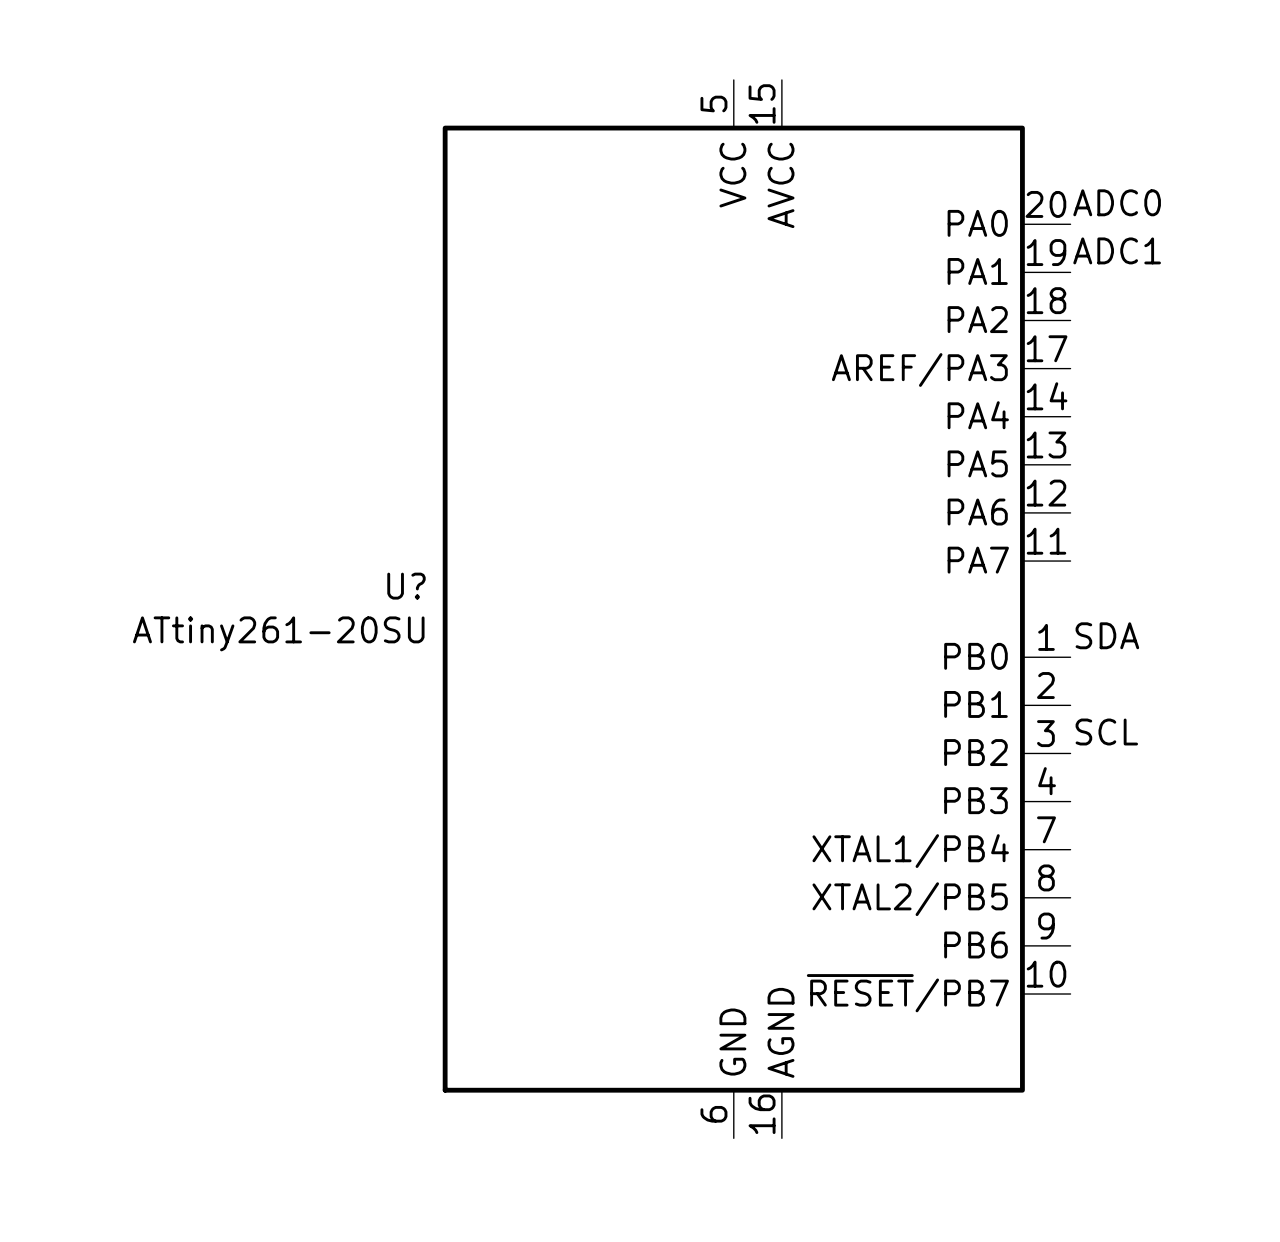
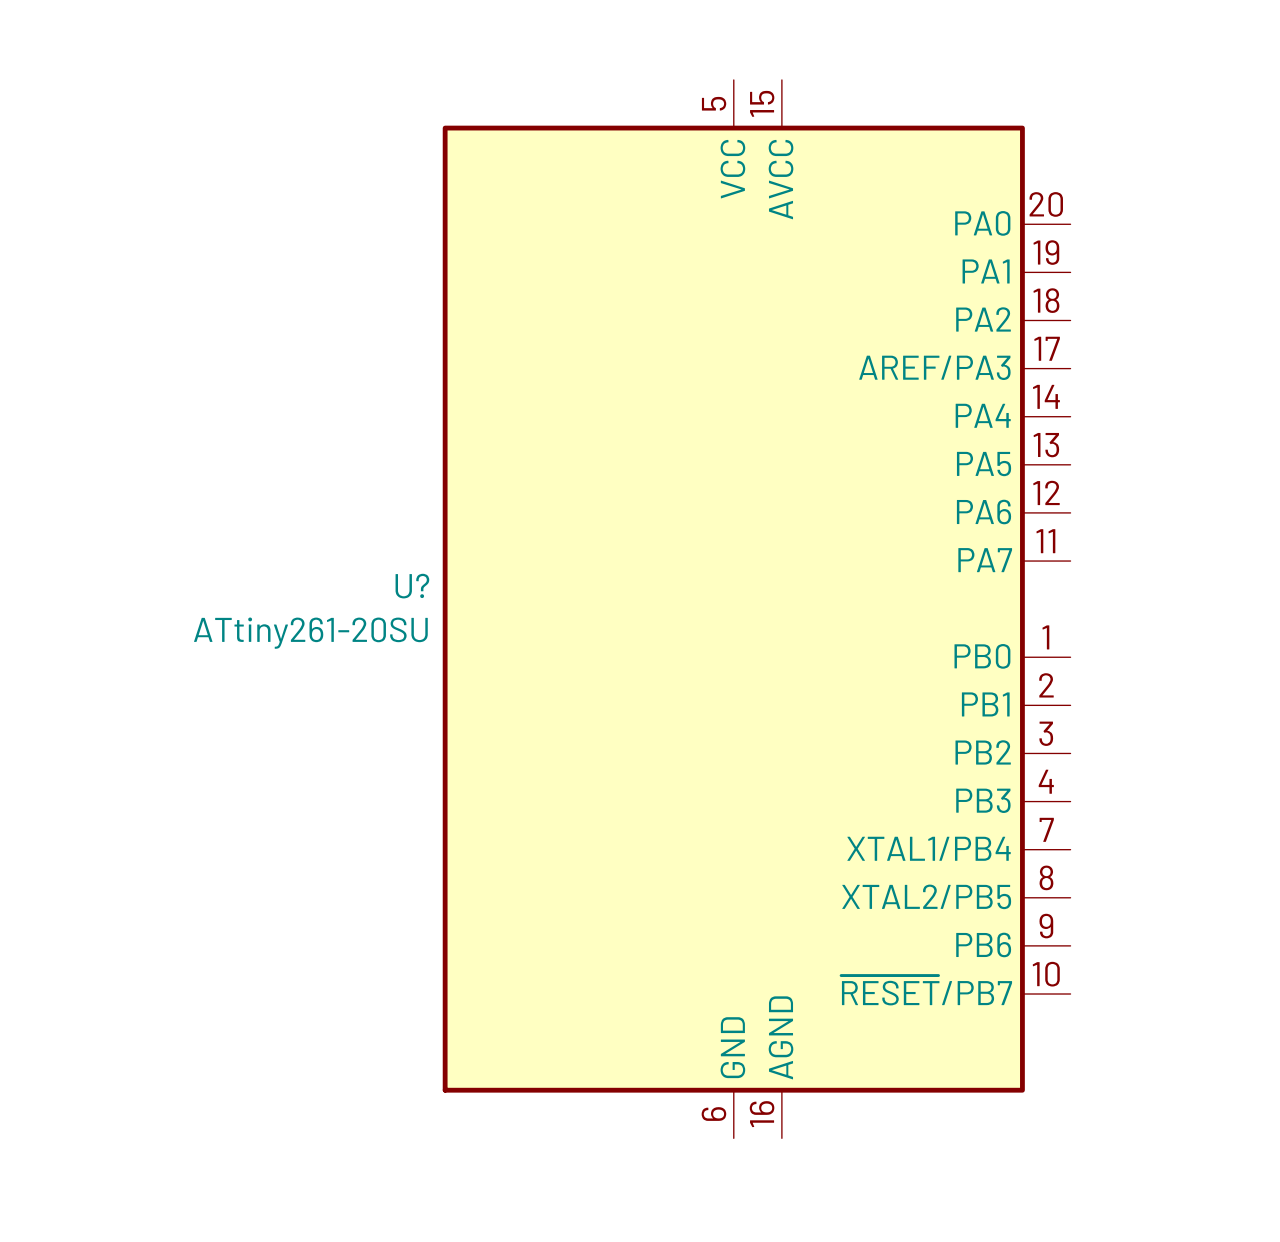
label: ADC0 (1117, 202) -> none
label: ADC1 (1117, 250) -> none
label: SDA (1107, 635) -> none
label: SCL (1106, 732) -> none

